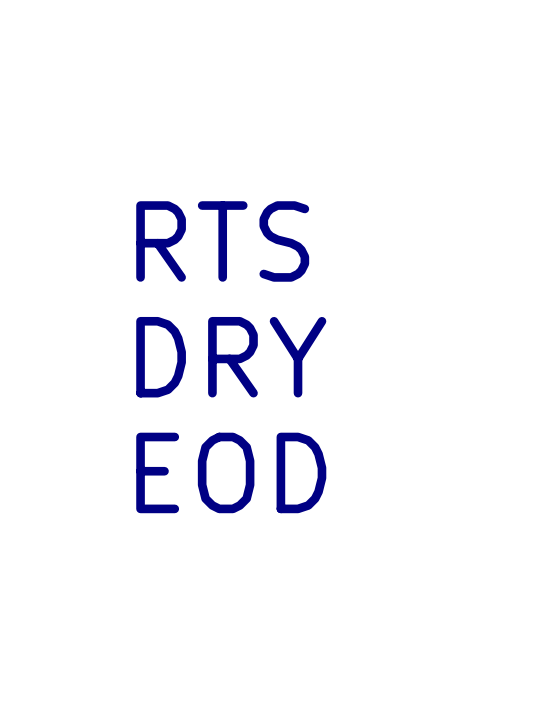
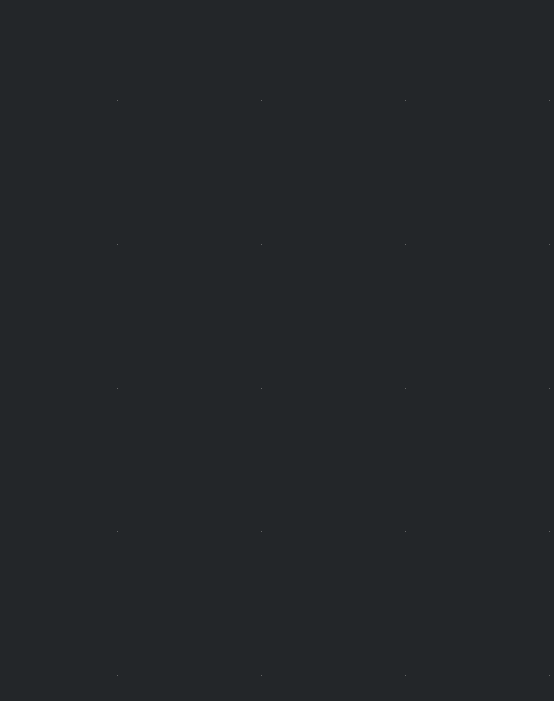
text: RTS (222, 241) -> none
text: DRY (231, 357) -> none
text: EOD (231, 472) -> none

